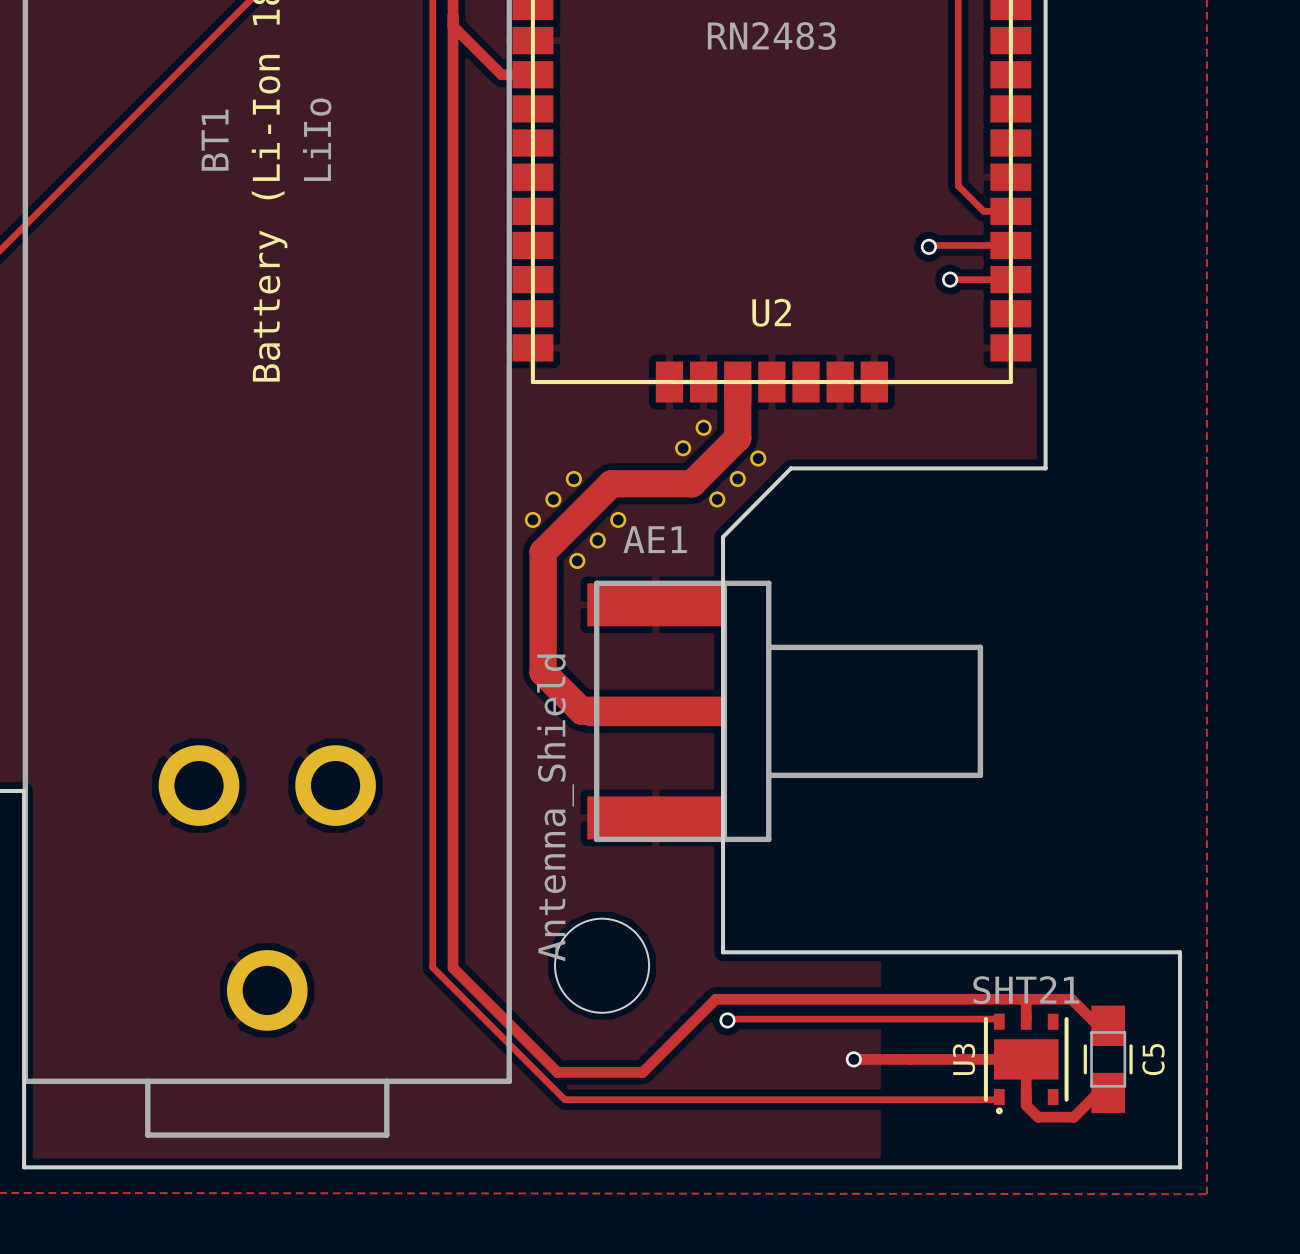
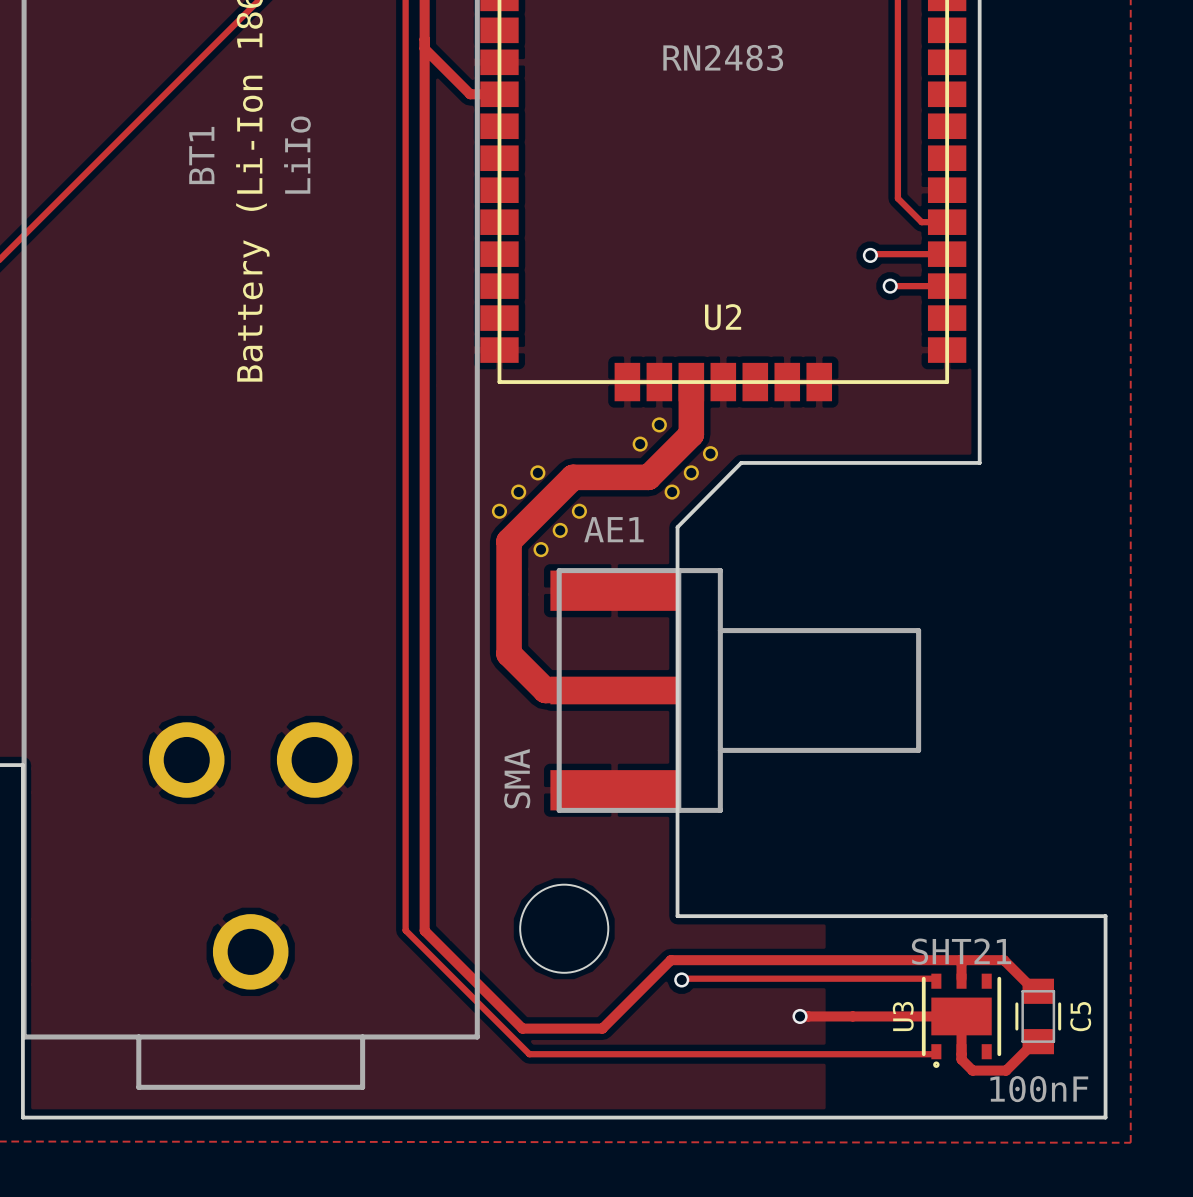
AE1 value: Antenna_Shield (555, 807) -> SMA (517, 778)
C5 footprint: [1083, 1005, 1133, 1114] -> [1015, 978, 1062, 1055]
C5 value: none -> 100nF (1039, 1089)

